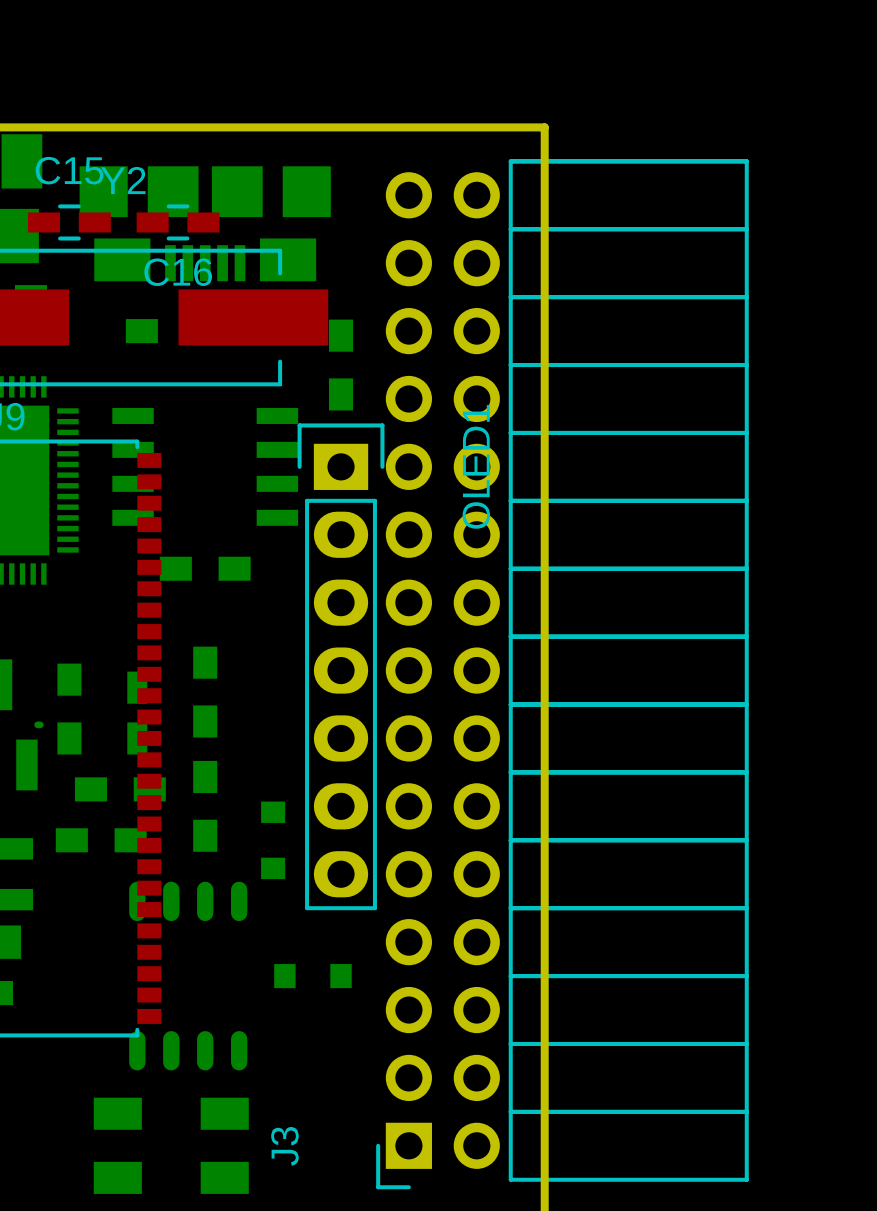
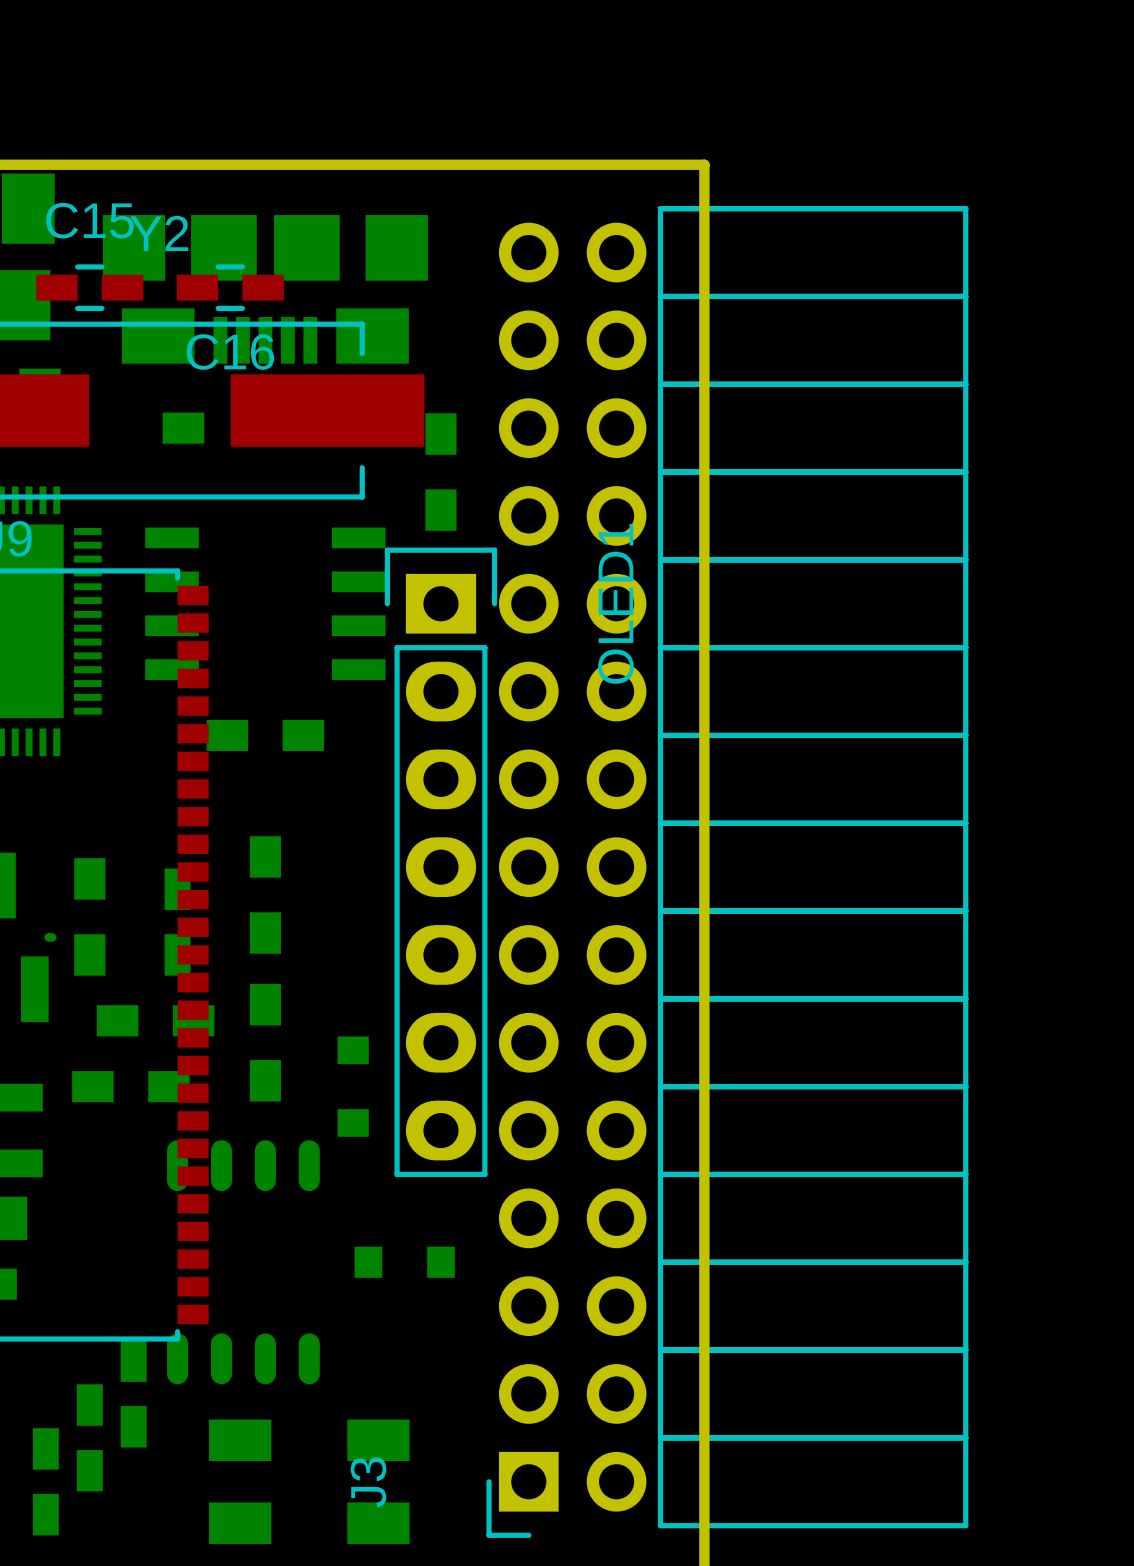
part: none -> (133, 1393)
part: none -> (89, 1437)
part: none -> (45, 1481)
part position: (171, 1145) -> (309, 1481)

